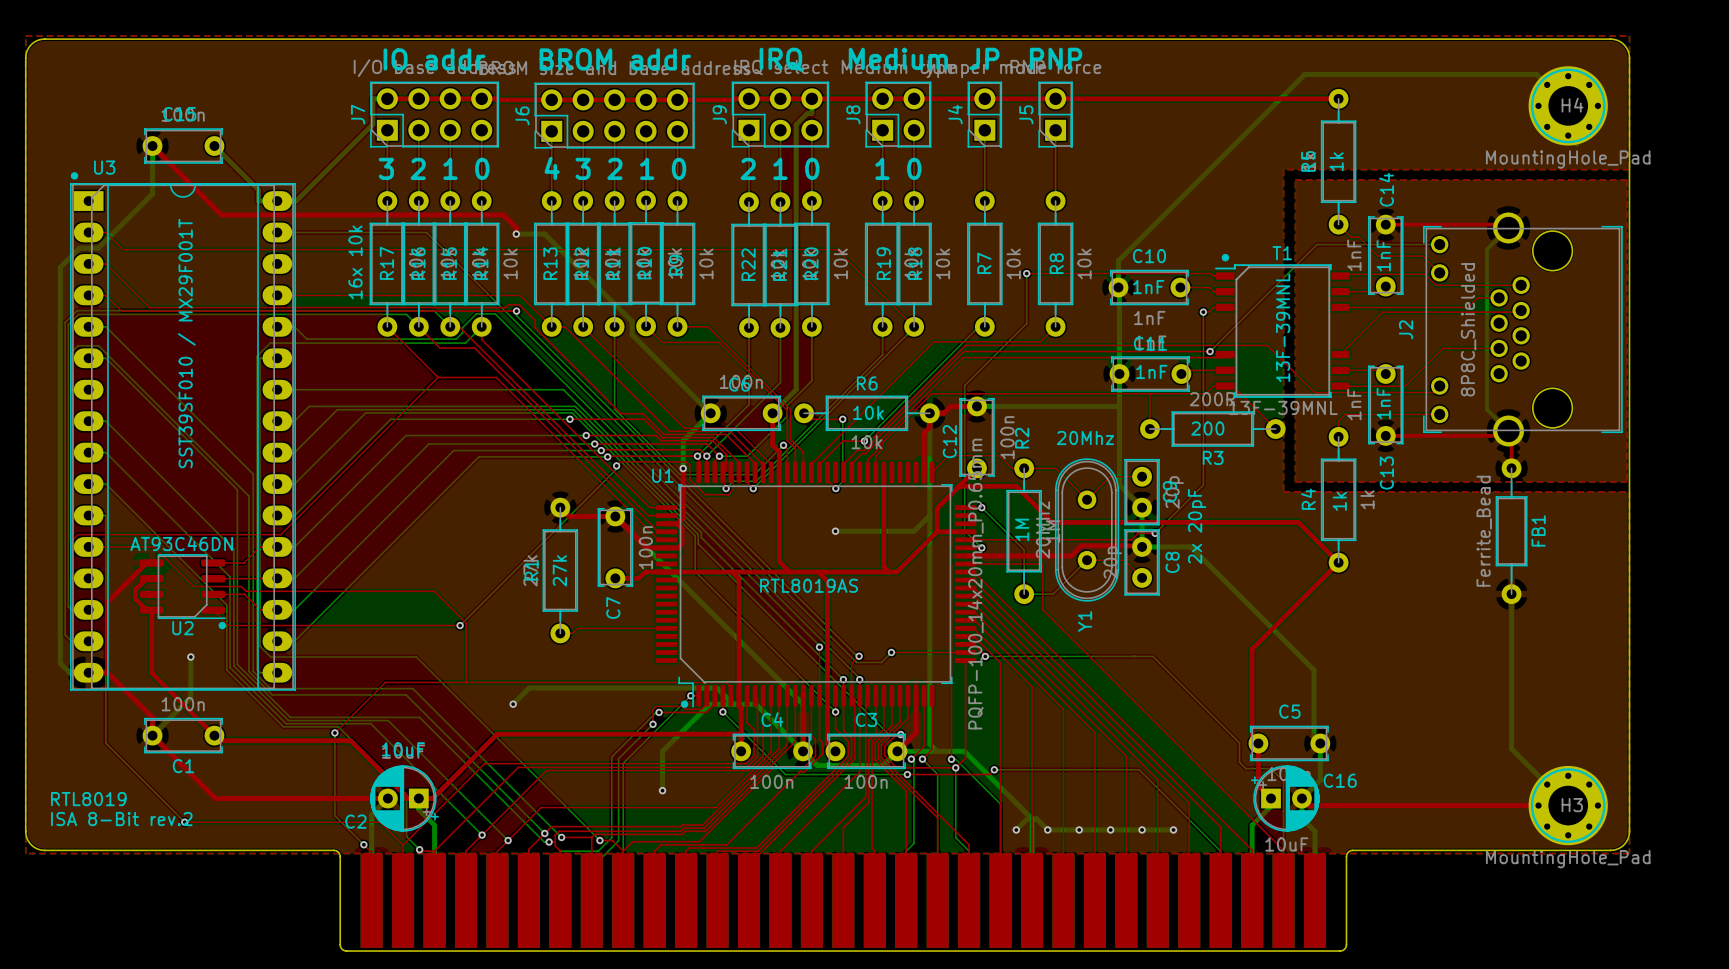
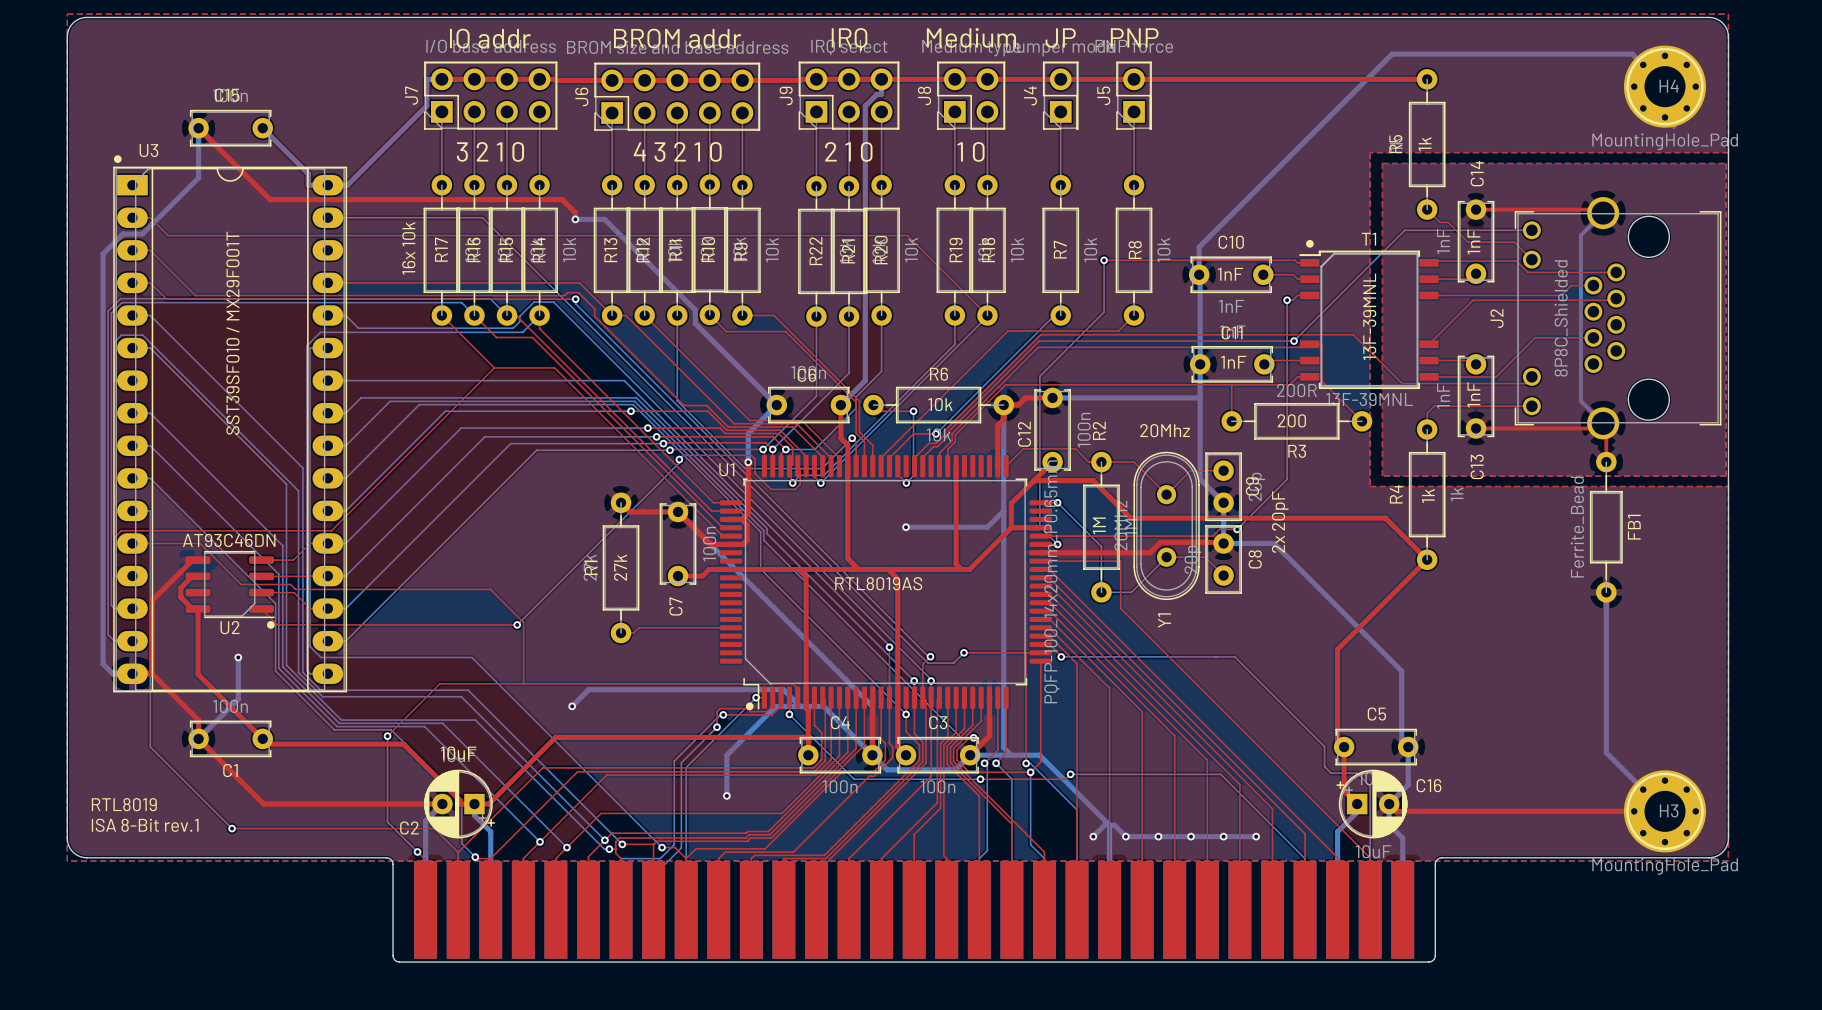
text: ISA 8-Bit rev.2 (121, 819) -> ISA 8-Bit rev.1 (145, 825)

